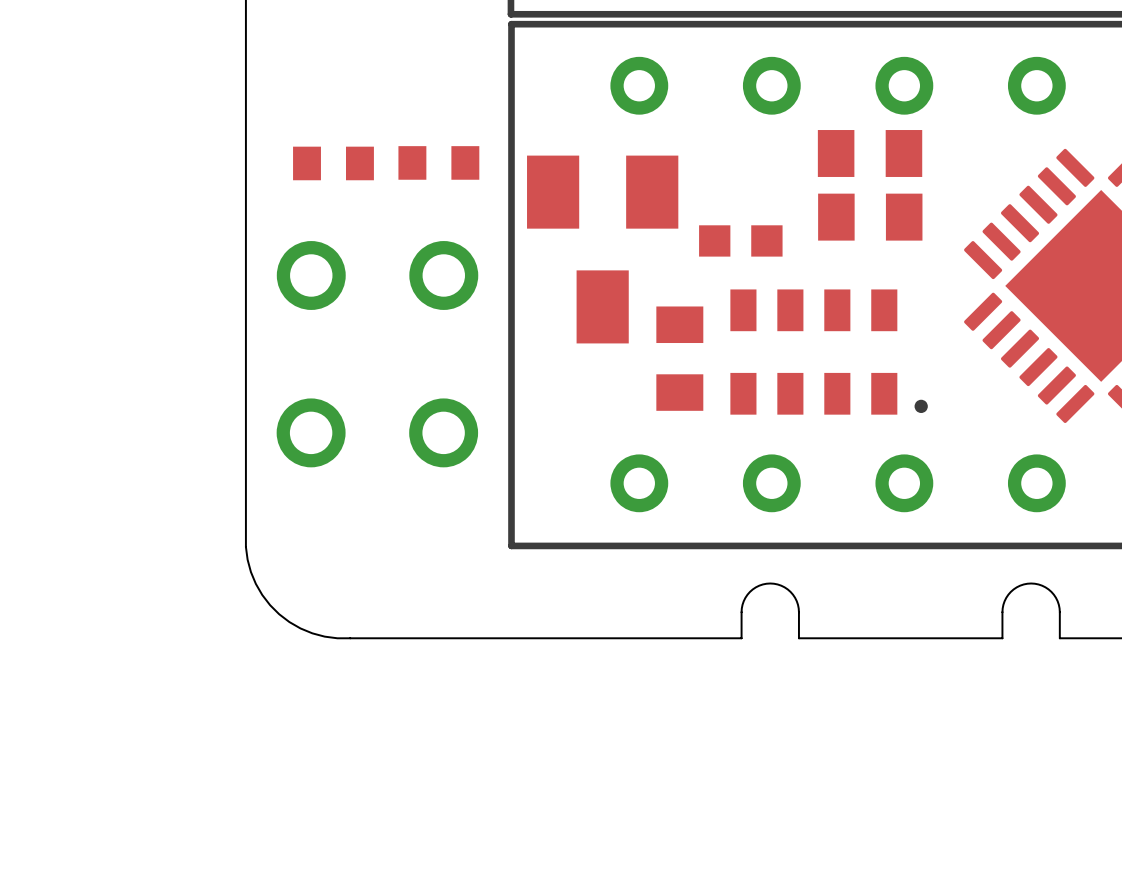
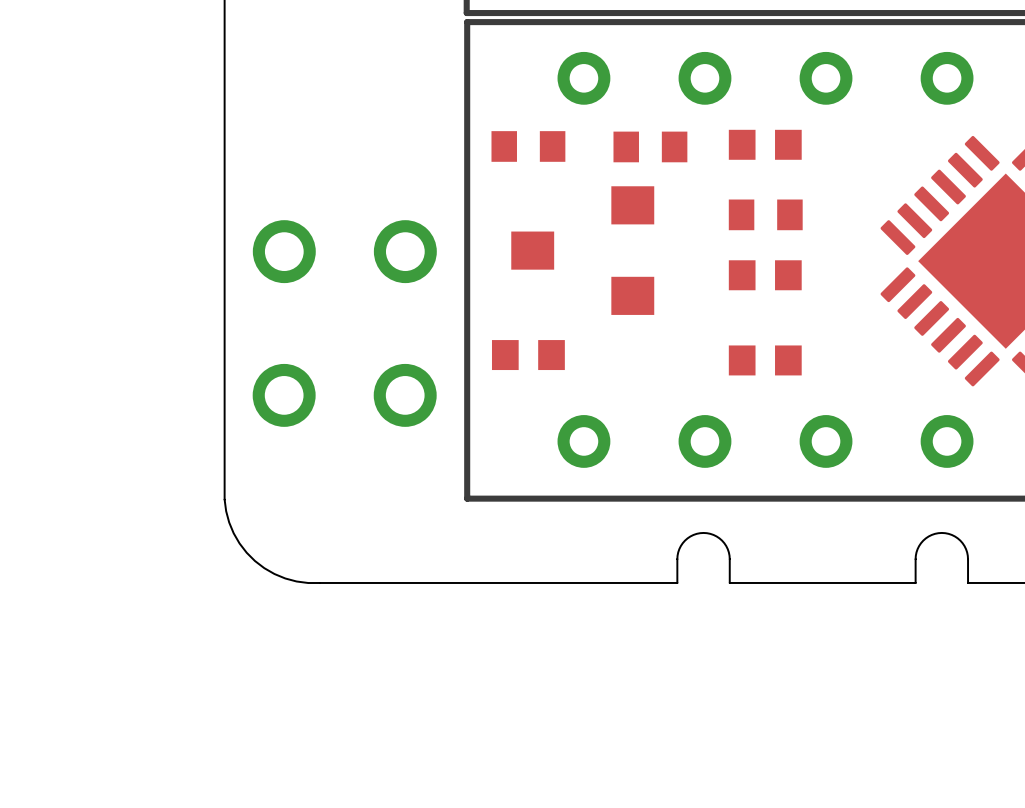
part footprint: [817, 130, 923, 177] -> [728, 129, 802, 160]
part footprint: [527, 155, 679, 344] -> [511, 186, 655, 315]
part: none -> (528, 146)
part: none -> (650, 146)
part: (438, 162) -> none
part: (333, 163) -> none
part: (870, 217) -> none
part: none -> (765, 214)
part: (740, 240) -> none
part: none -> (765, 275)
part: (829, 352) -> none
part: (679, 358) -> none
part: none -> (528, 355)
part: none -> (765, 360)

